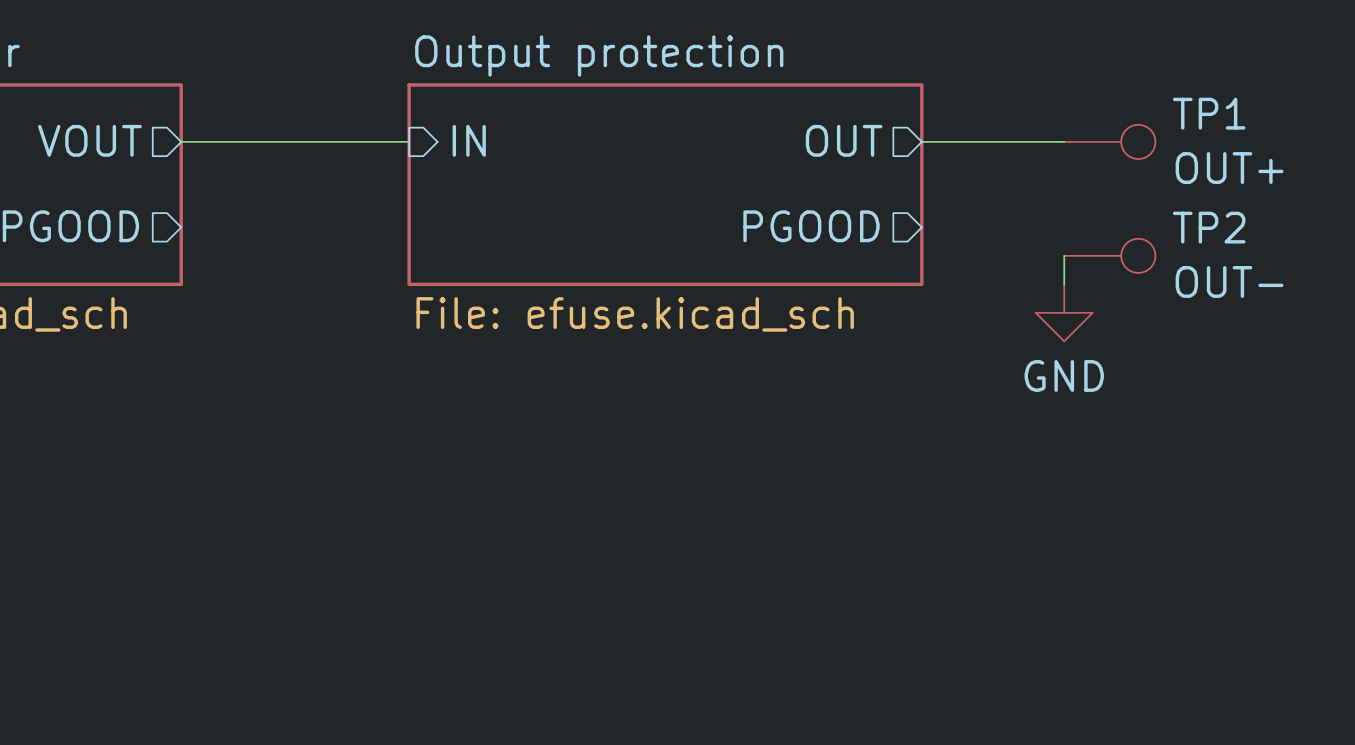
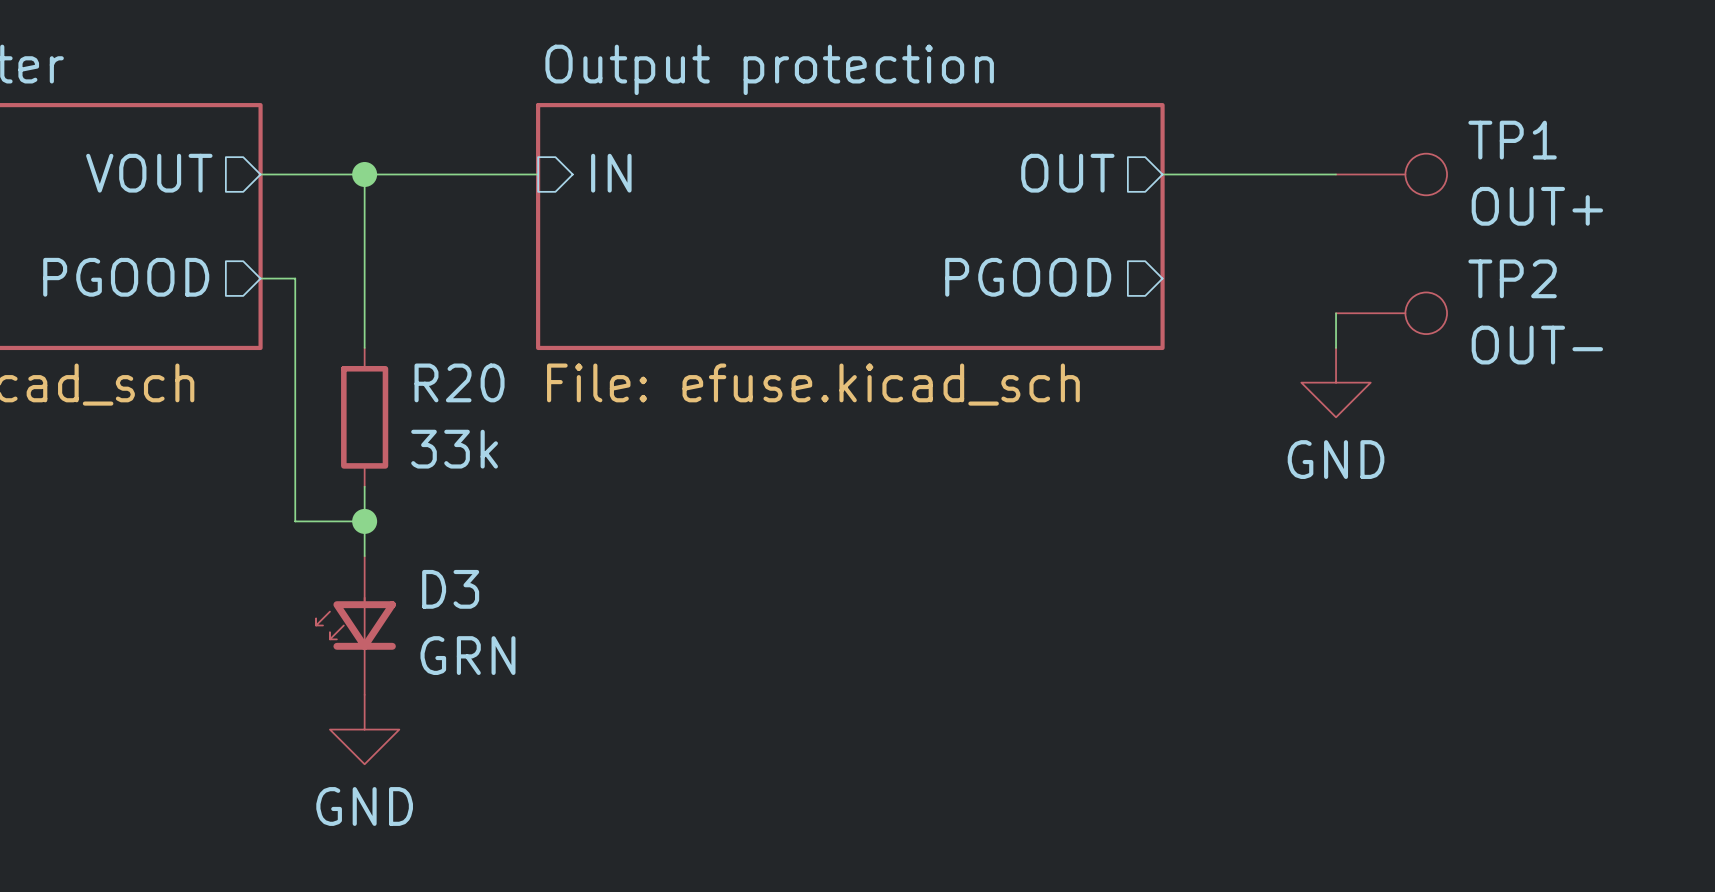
wire: none -> (364, 174) (364, 347)
junction: none -> (364, 174)
wire: none -> (260, 278) (295, 278) (295, 521) (364, 521)
R20: none -> 33k (364, 417)
wire: none -> (364, 486) (364, 556)
junction: none -> (364, 521)
D3: none -> GRN (355, 625)
power symbol: none -> GND (364, 729)

